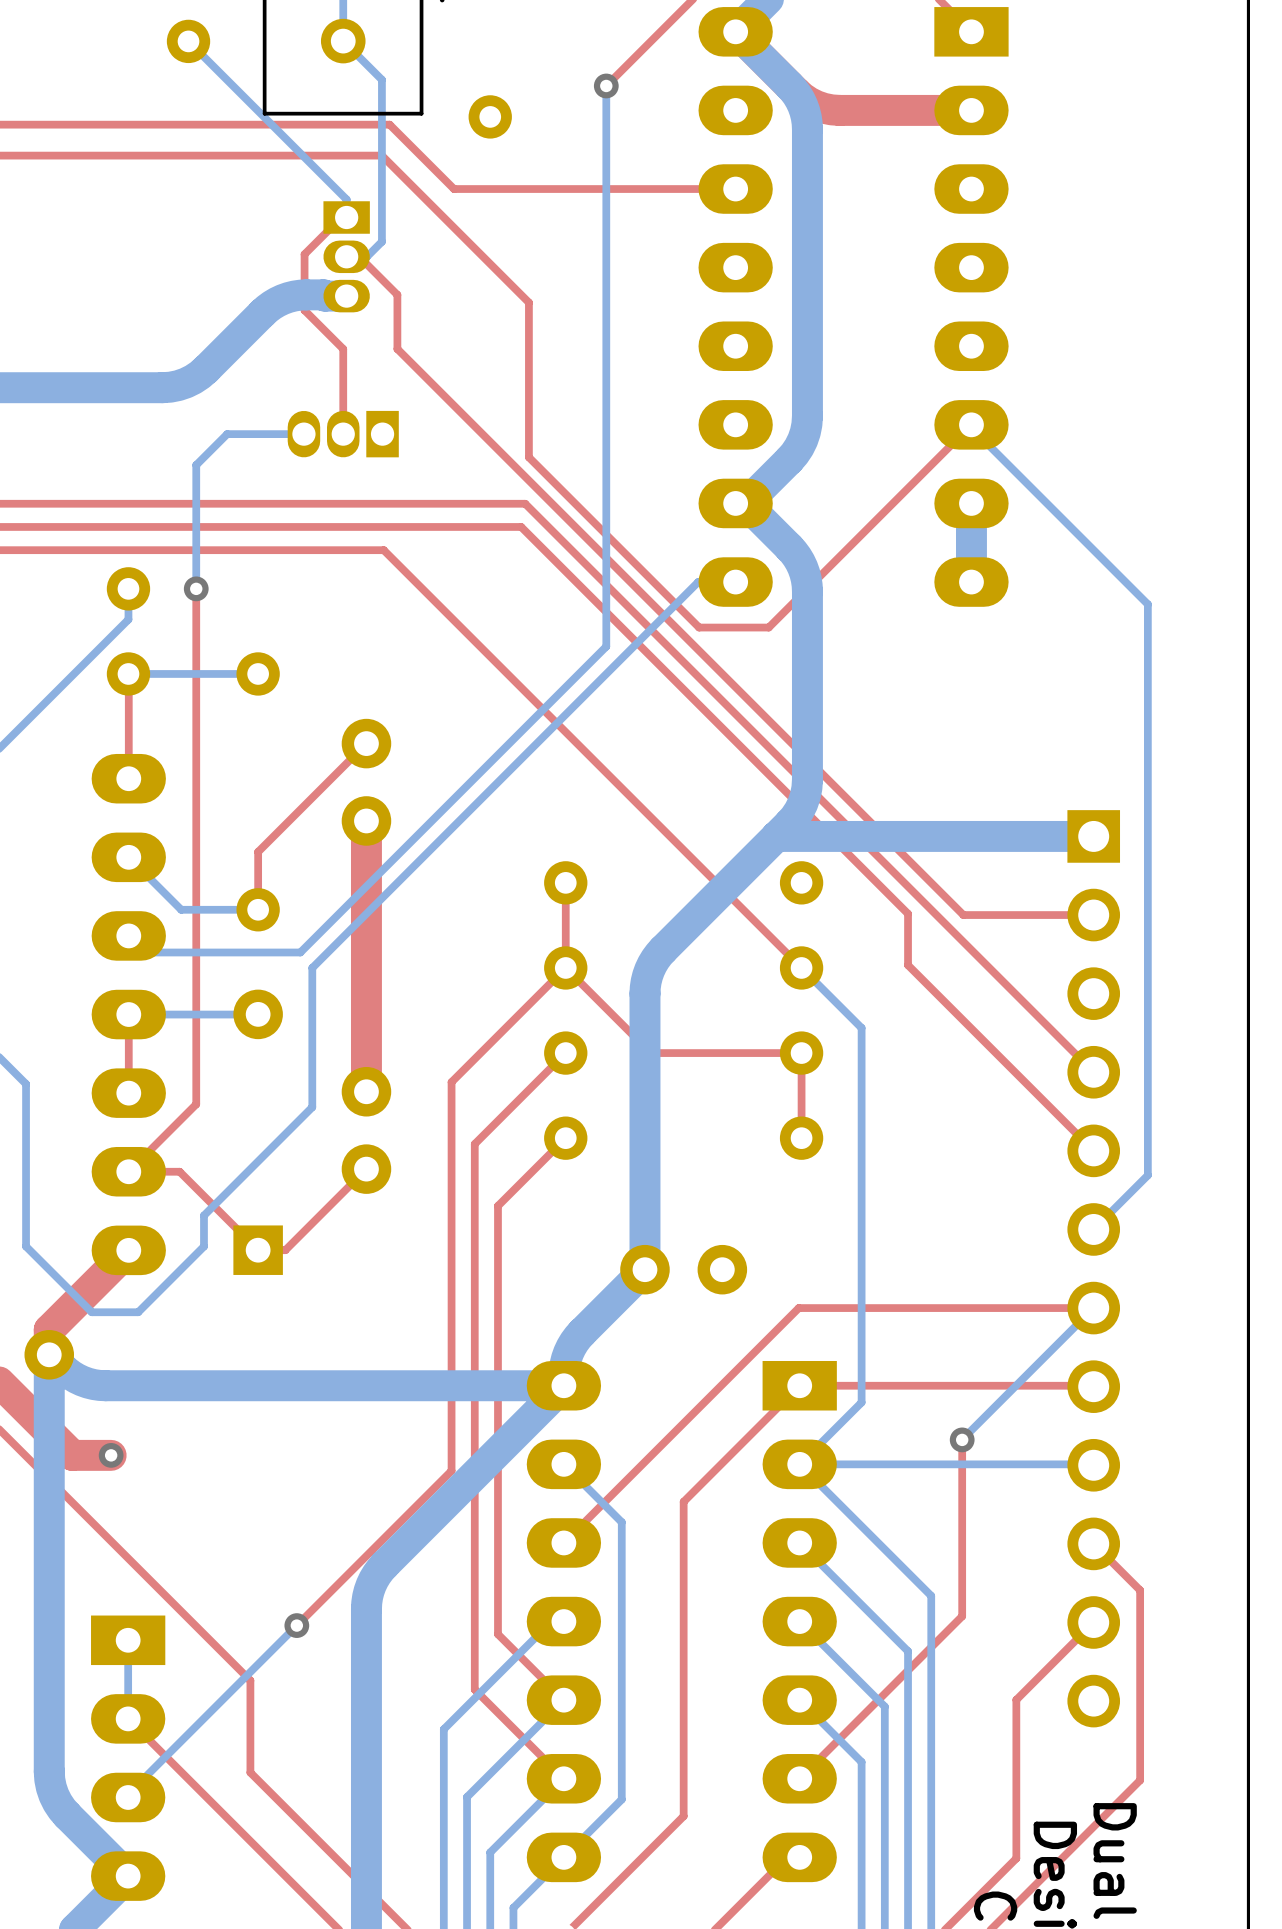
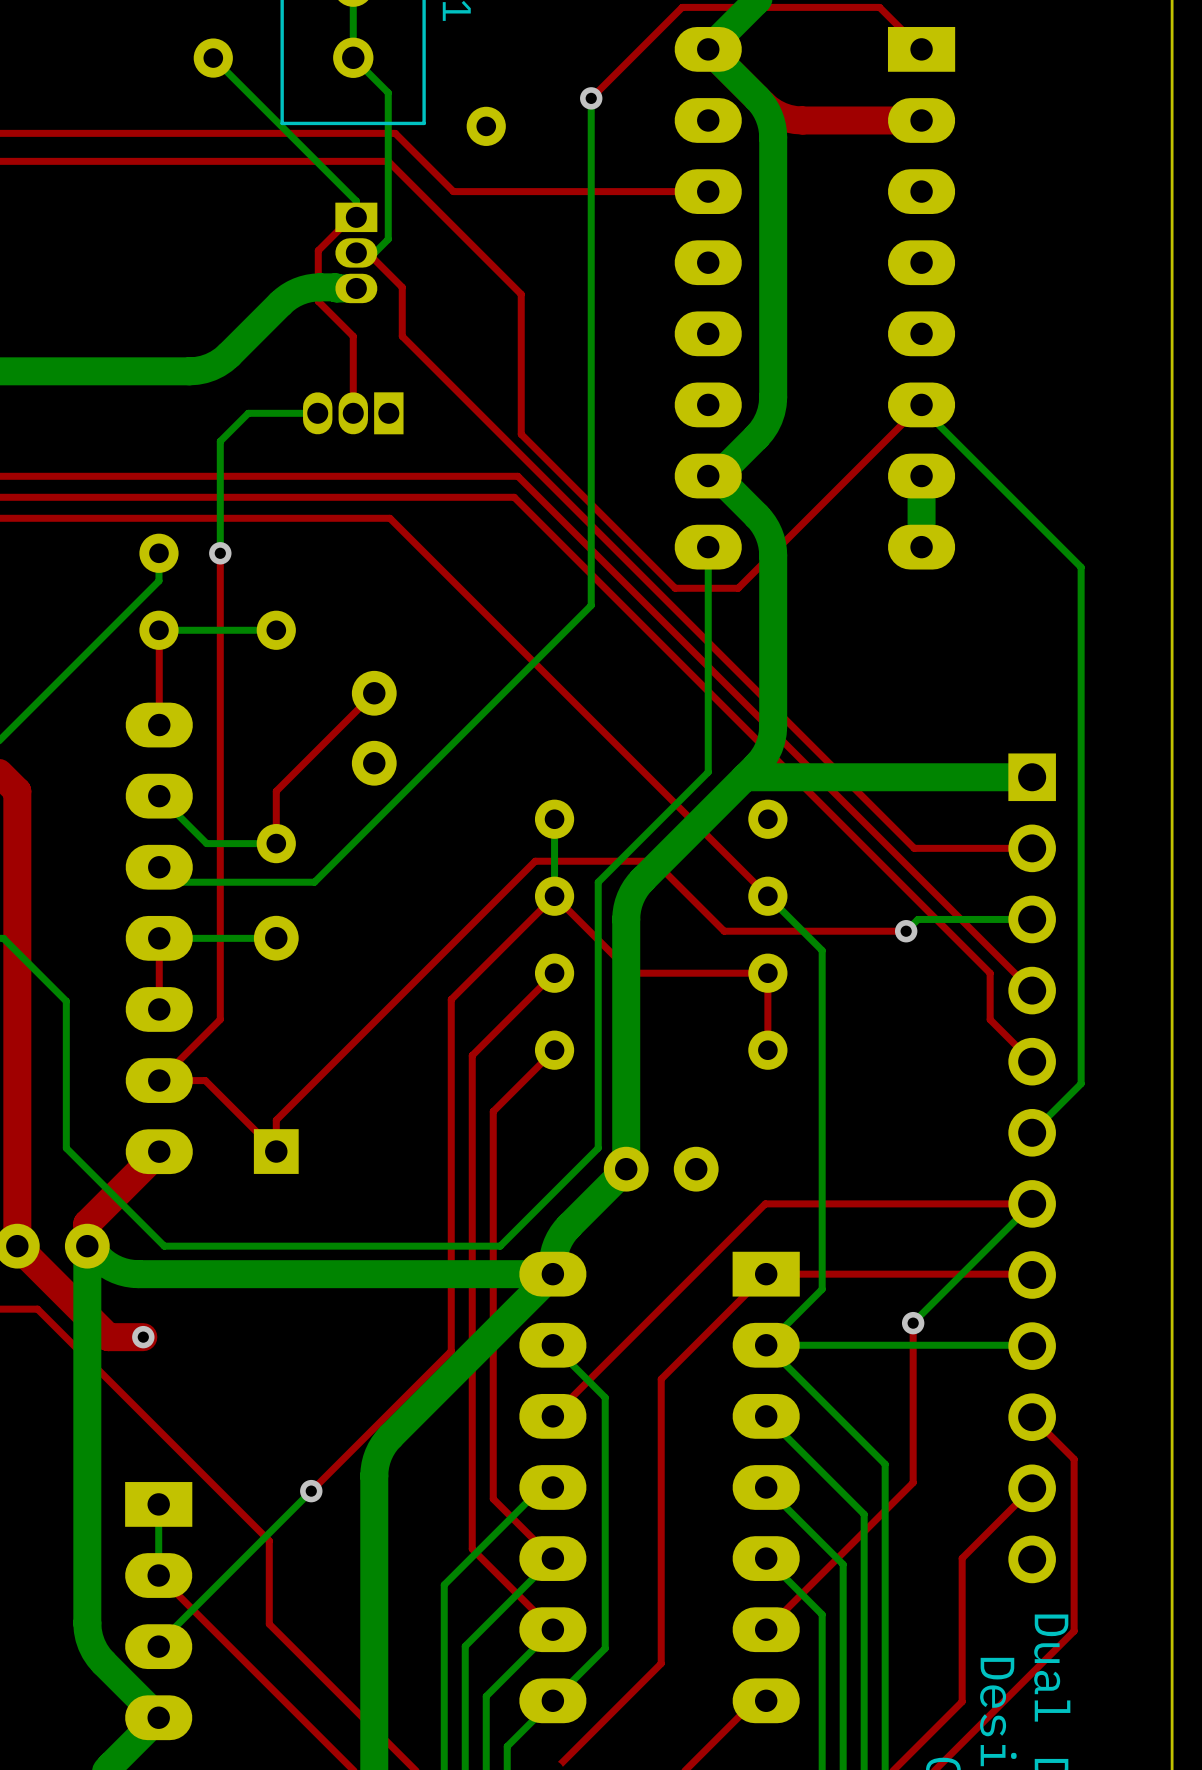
bottom track: (735, 582) (698, 582) (312, 967) (312, 1107) (203, 1215) (203, 1246) (138, 1312) (91, 1312) -> (708, 547) (708, 772) (598, 882) (598, 1148) (500, 1246) (164, 1246) (125, 1207)
top track: (366, 820) (366, 1091) -> none
top track: (565, 882) (565, 967) -> none
bottom track: none -> (554, 819) (554, 896)
top track: (908, 913) (908, 965) (1047, 1104) -> (864, 847) (990, 973) (990, 1019)
bottom track: none -> (1032, 919) (917, 919) (906, 931)
via: none -> (906, 931)
part: (366, 1130) -> none
top track: (366, 1169) (285, 1250) (258, 1250) -> (906, 931) (724, 931) (654, 861) (535, 861) (276, 1120) (276, 1151)

